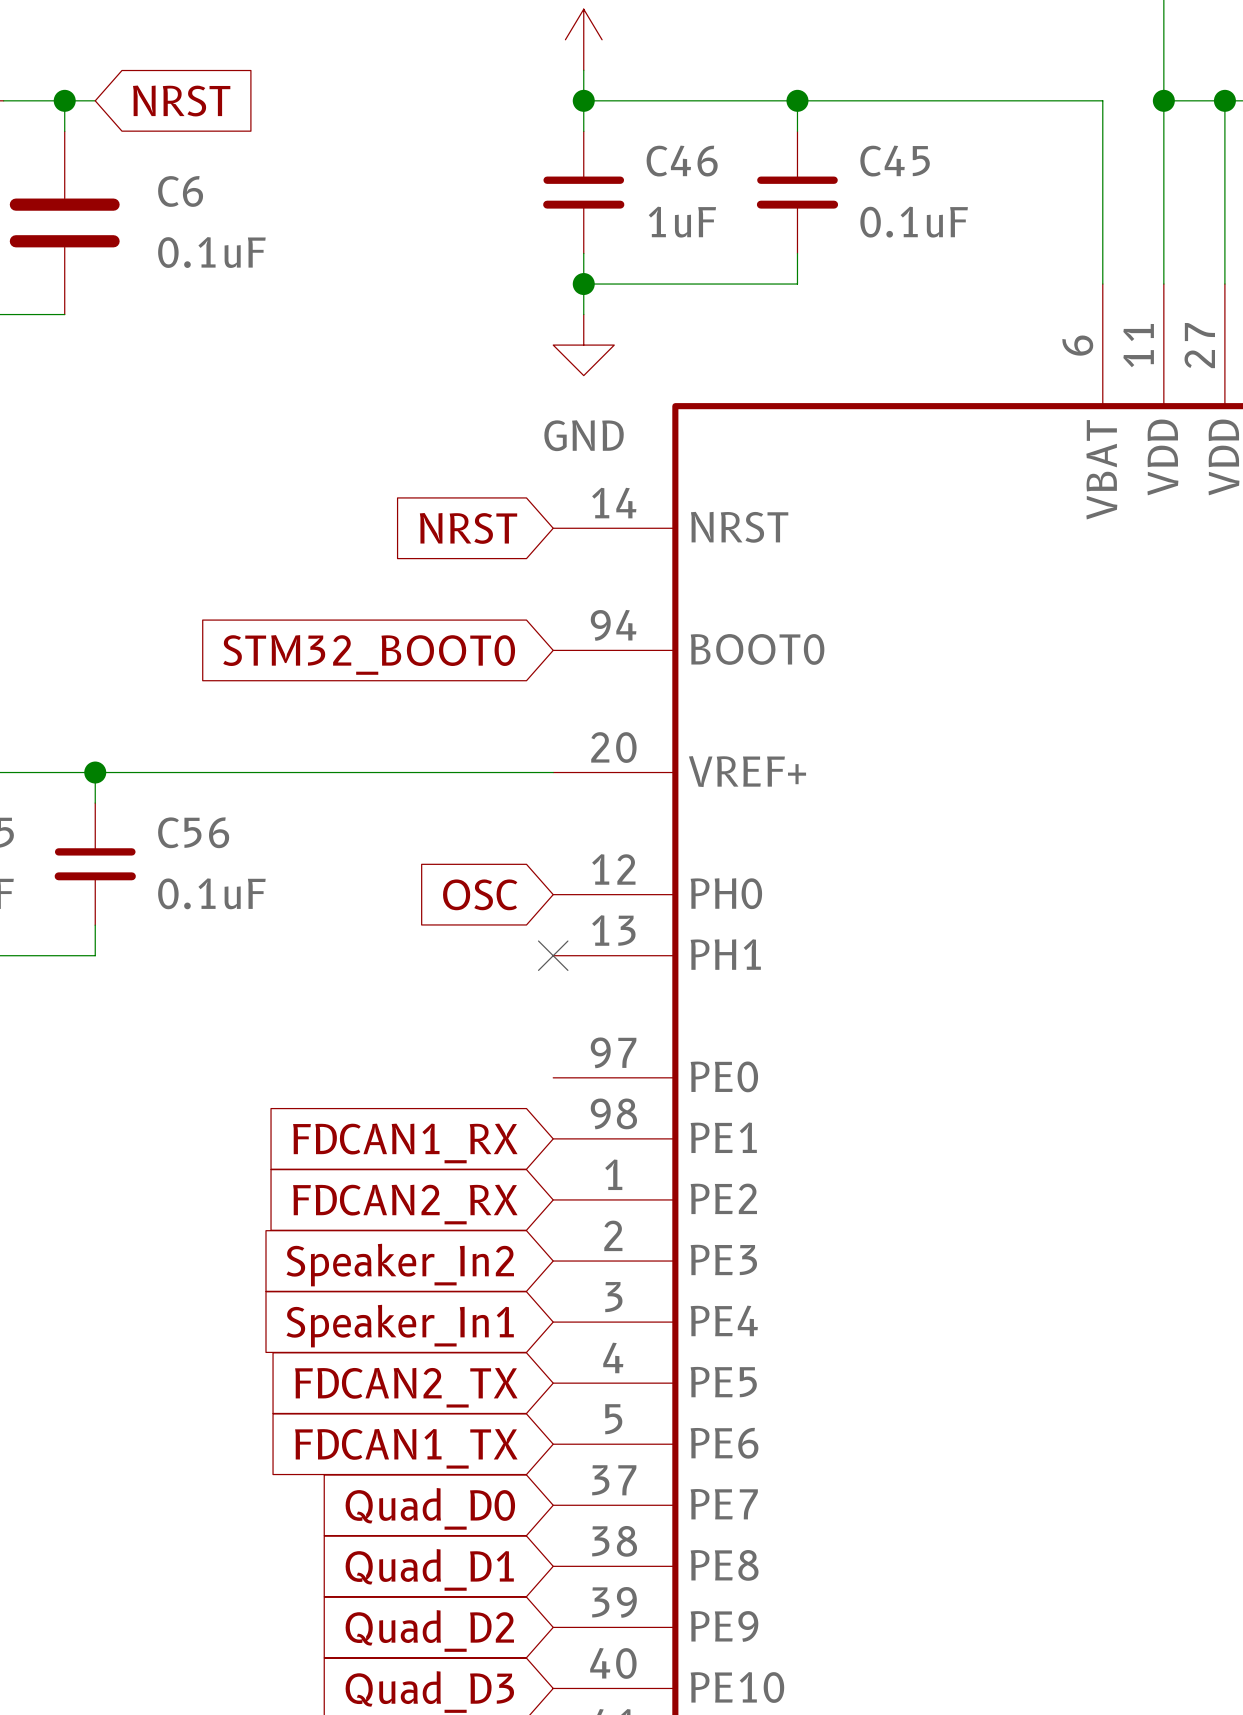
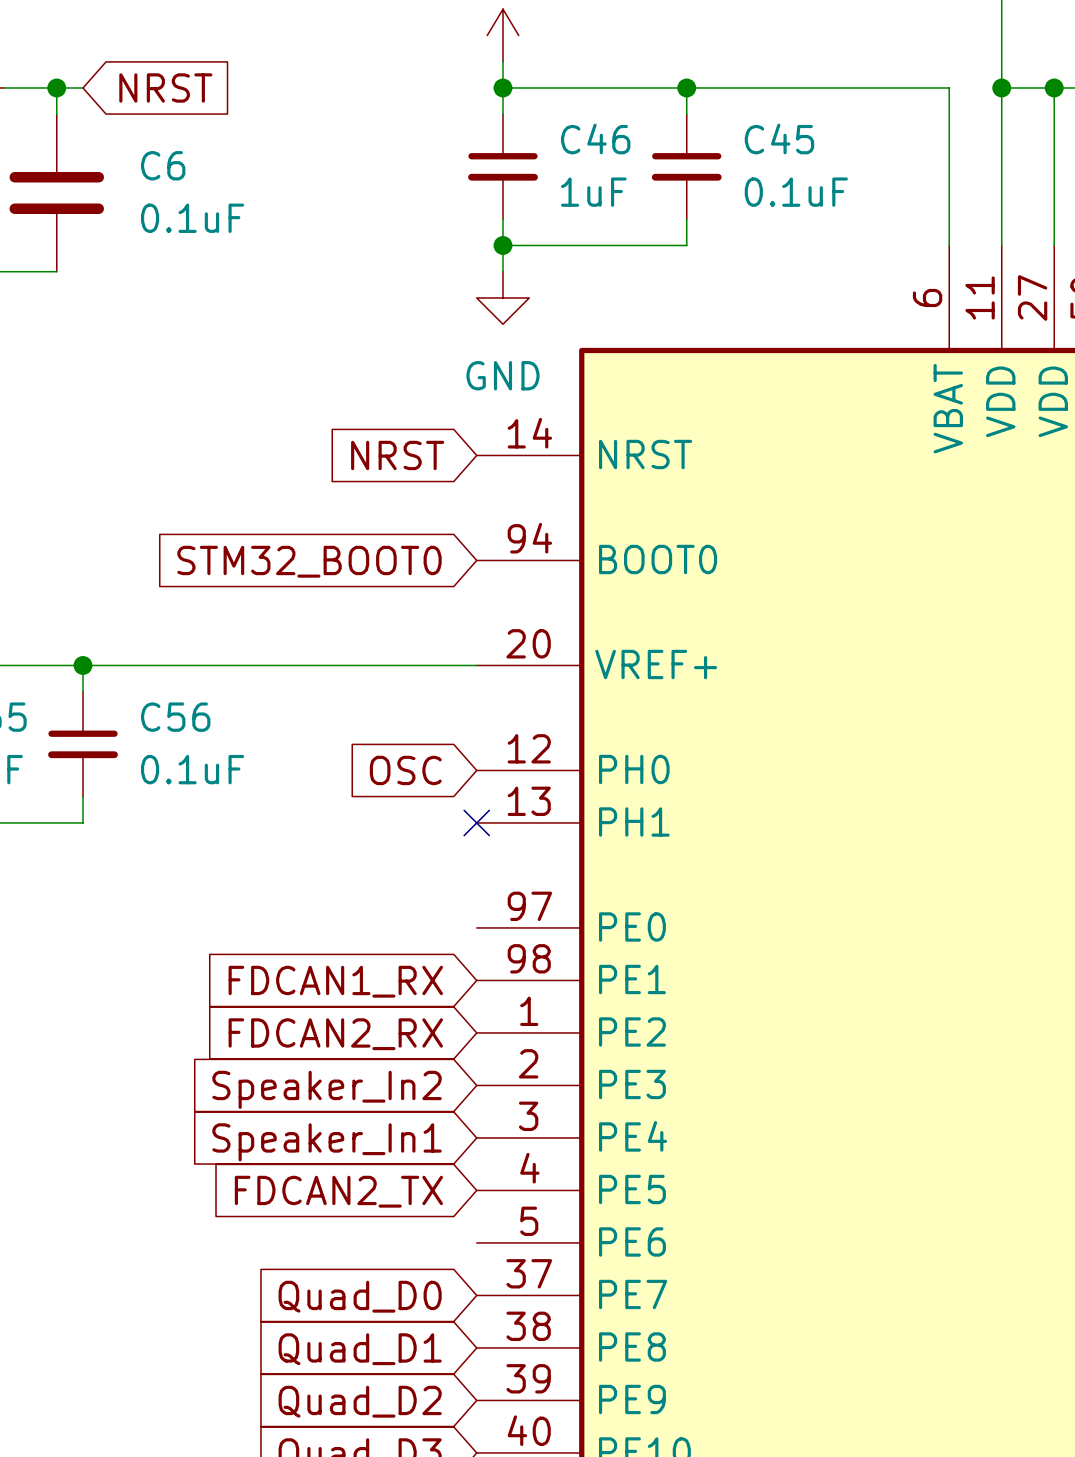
global label: FDCAN1_TX (406, 1448) -> none

